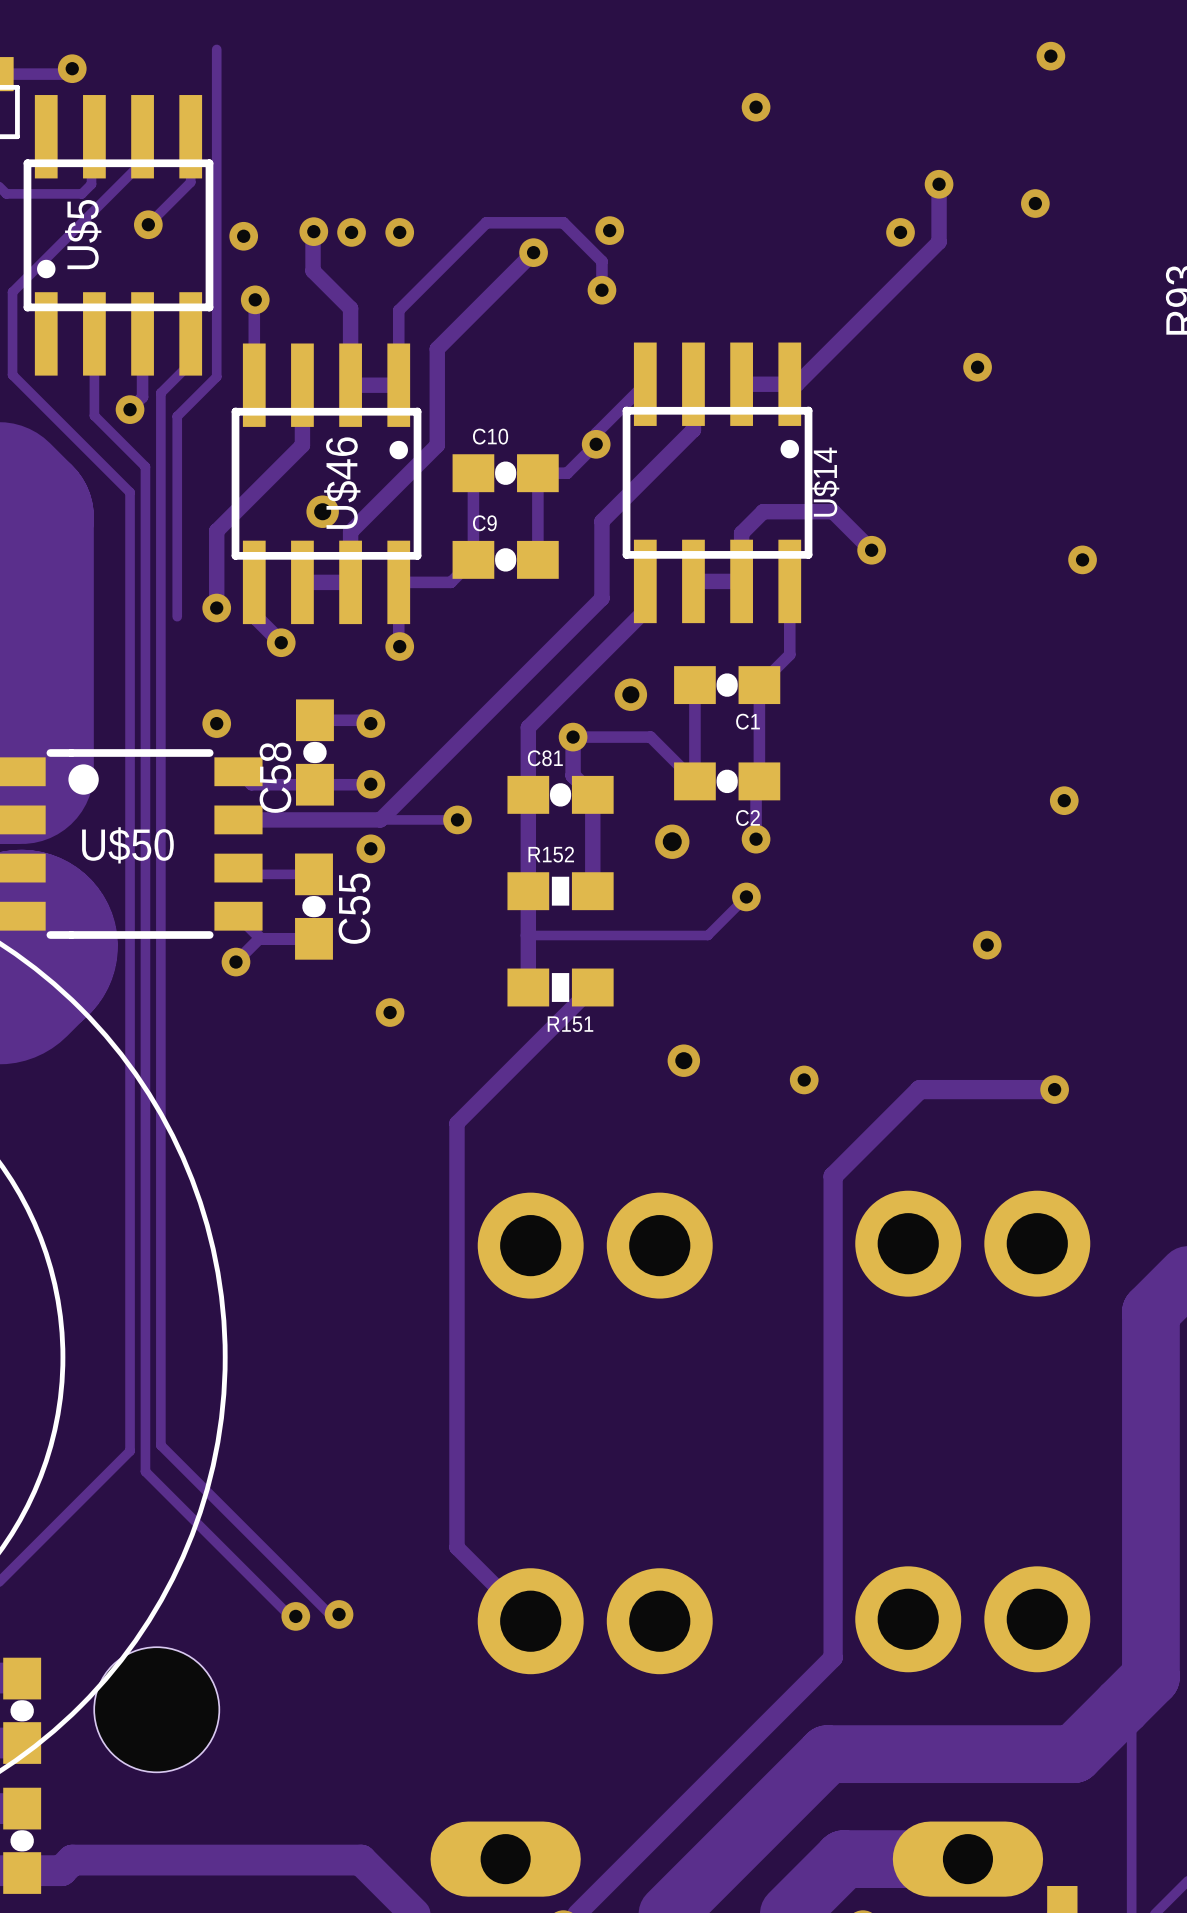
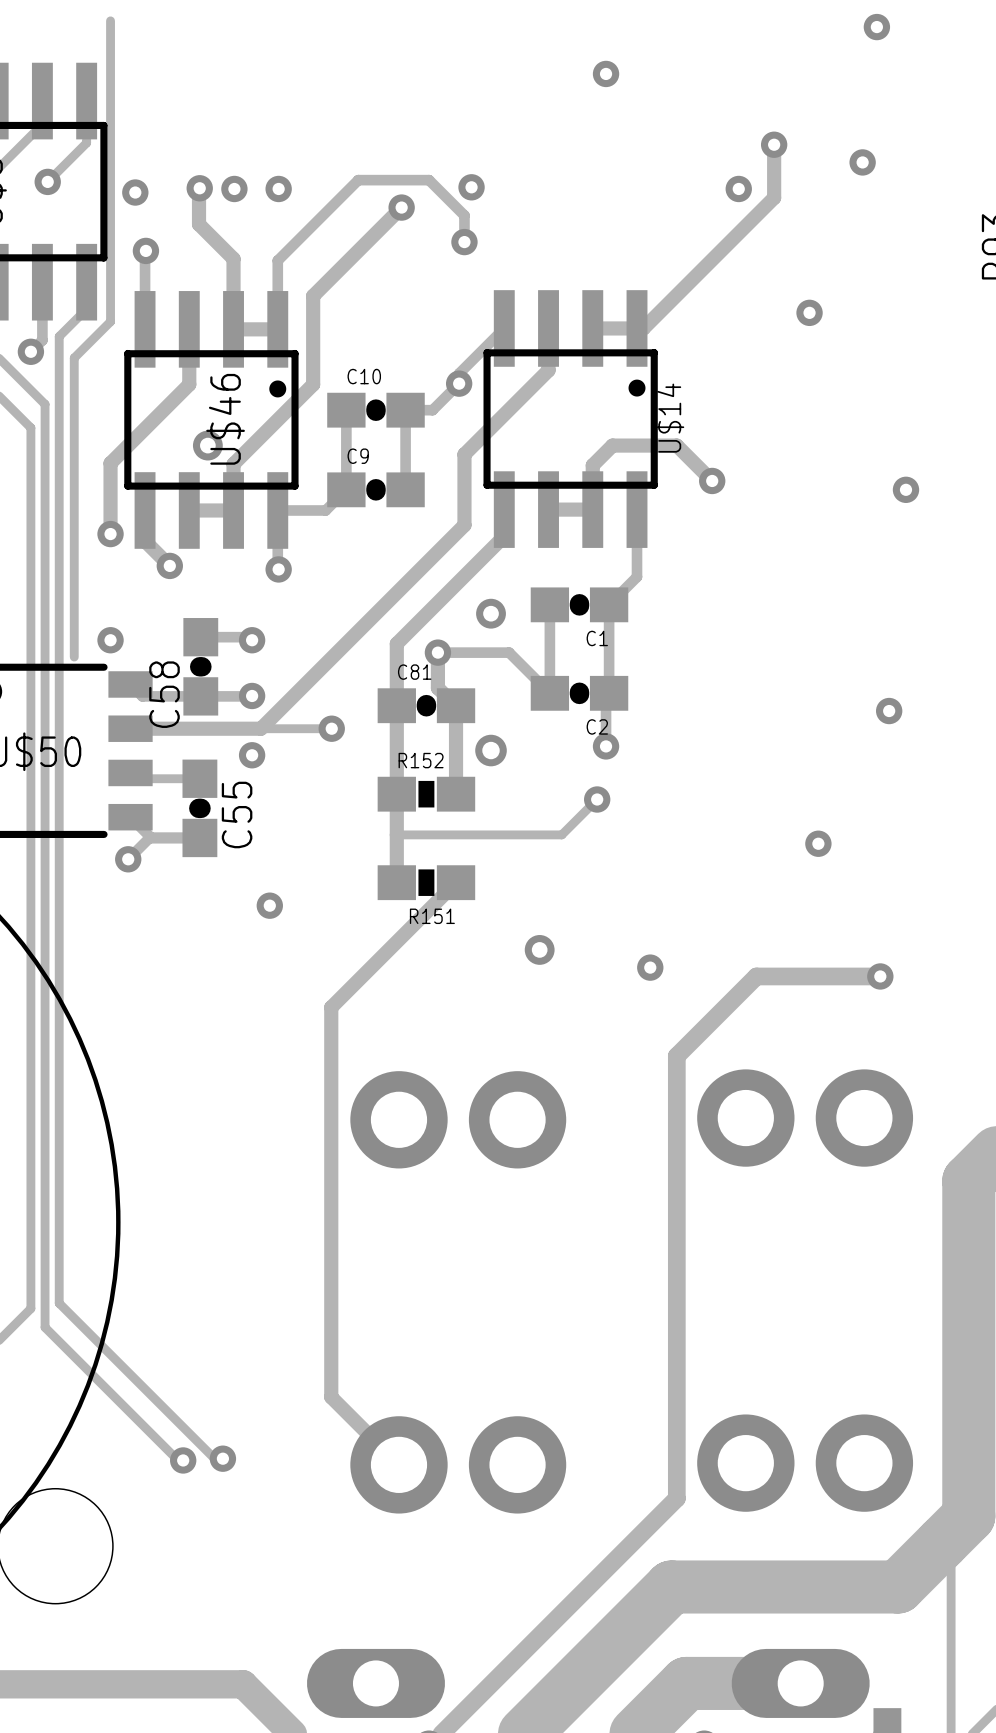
track: none -> (74, 542) (74, 657)
via position: (672, 841) -> (491, 750)

